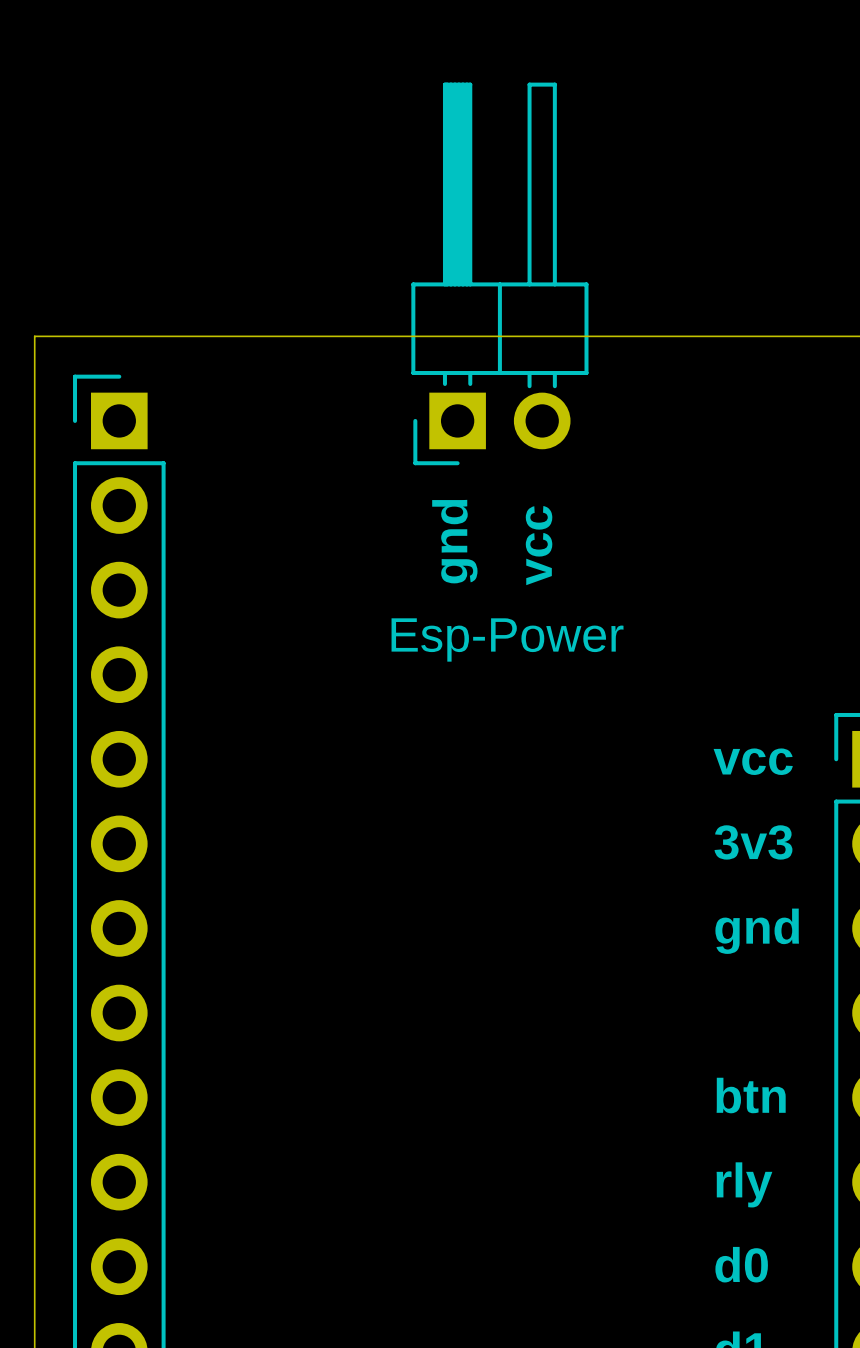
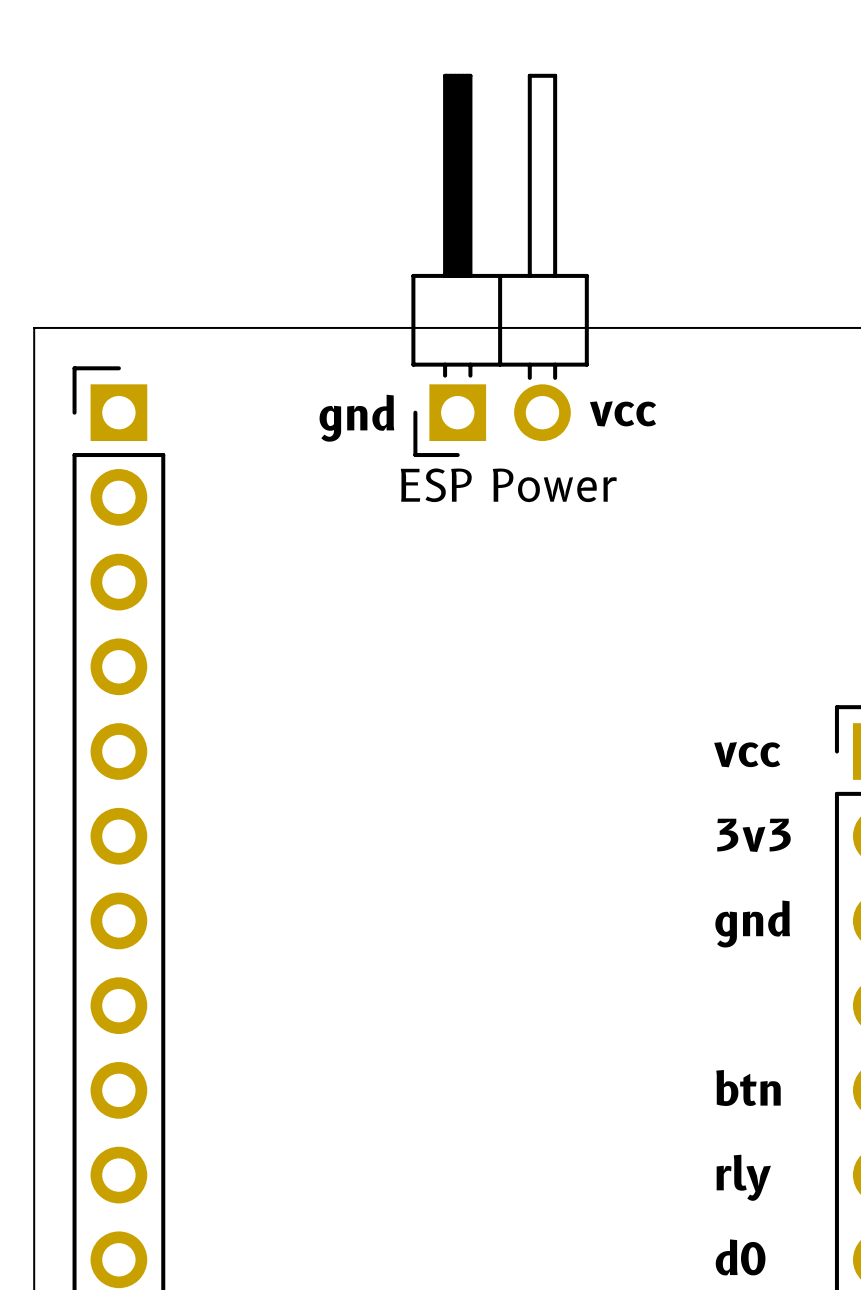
text rotation: 0° (454, 541) -> 90° clockwise (356, 418)
text position: gnd (454, 541) -> gnd (356, 418)
text rotation: 0° (539, 545) -> 90° clockwise (623, 413)
text position: vcc (539, 545) -> vcc (623, 413)
Esp-Power name: Esp-Power (507, 639) -> ESP Power (508, 485)

